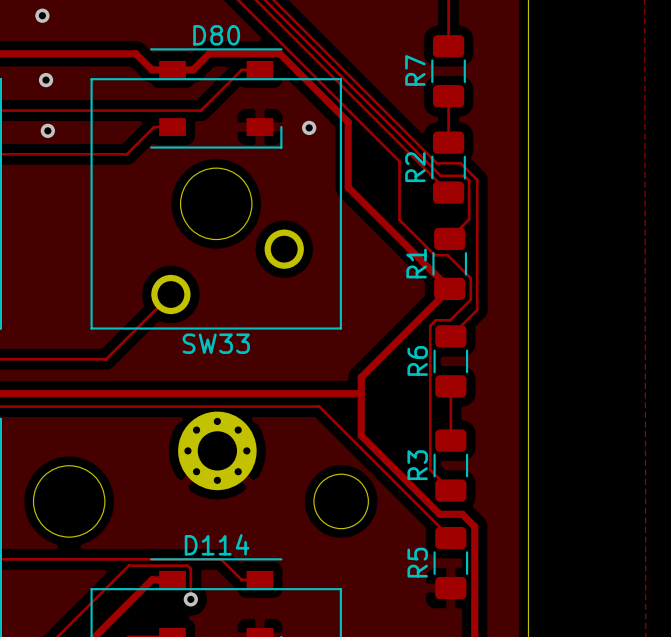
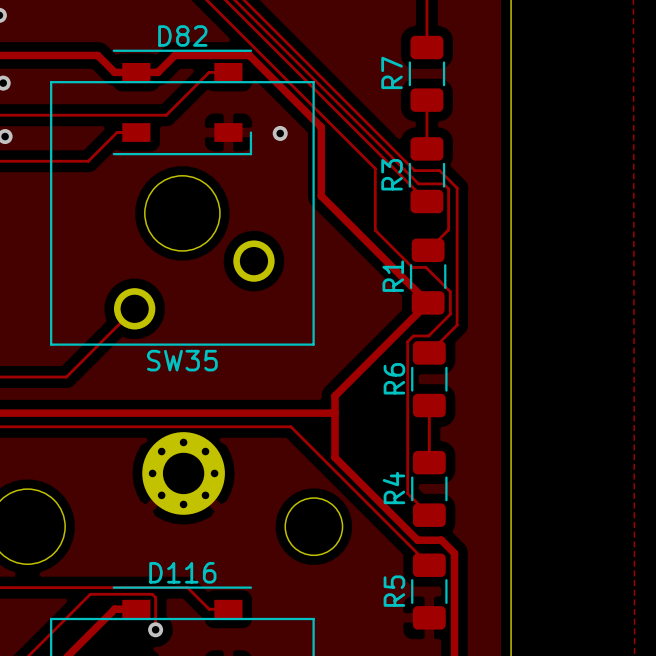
D80 name: D80 (216, 35) -> D82 (182, 35)
R2 name: R2 (415, 167) -> R3 (392, 174)
SW33 name: SW33 (216, 343) -> SW35 (182, 360)
R3 name: R3 (417, 465) -> R4 (393, 488)
D114 name: D114 (217, 544) -> D116 (182, 572)

